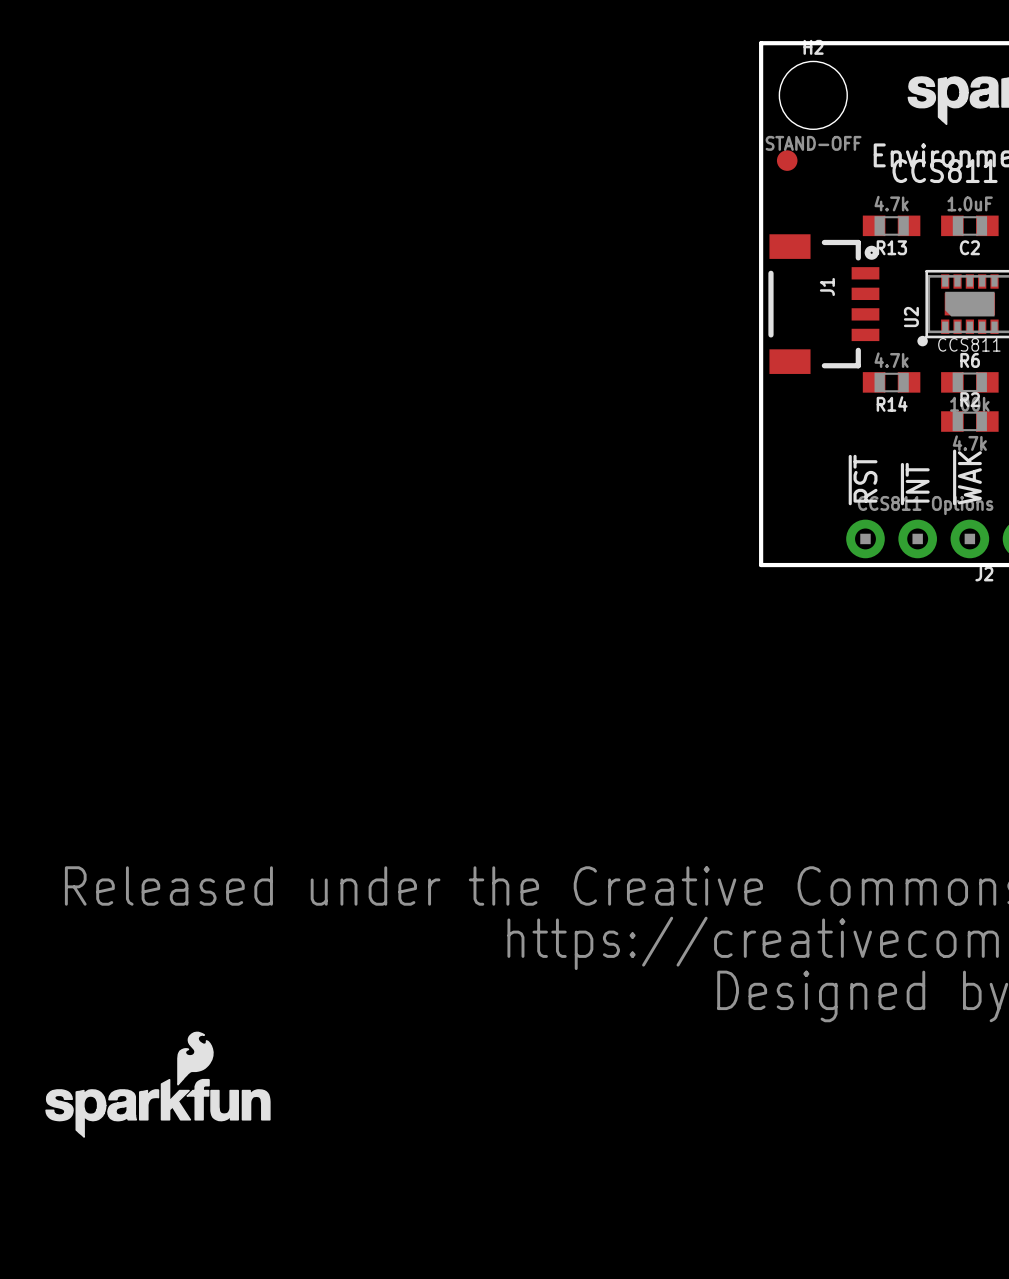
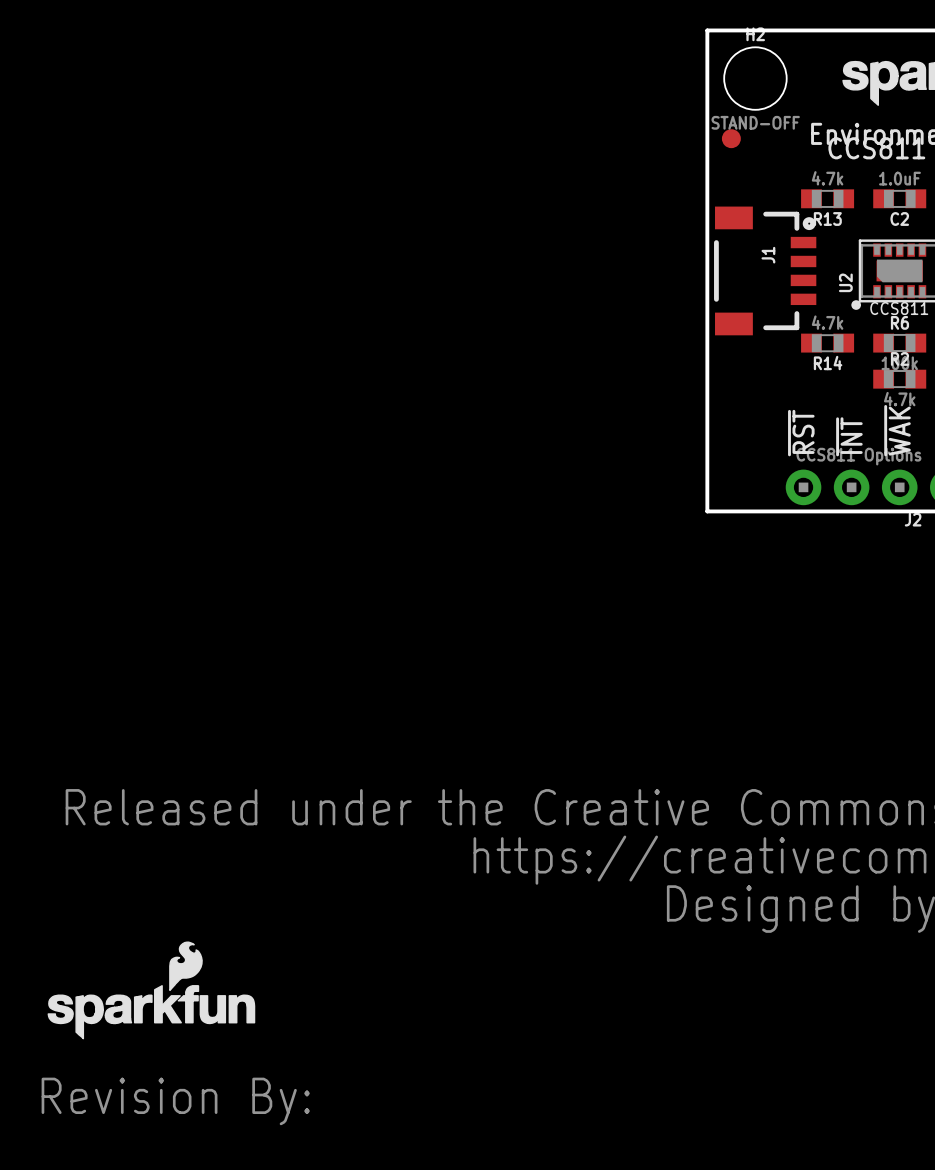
drawing: none -> [41, 1077, 310, 1126]

